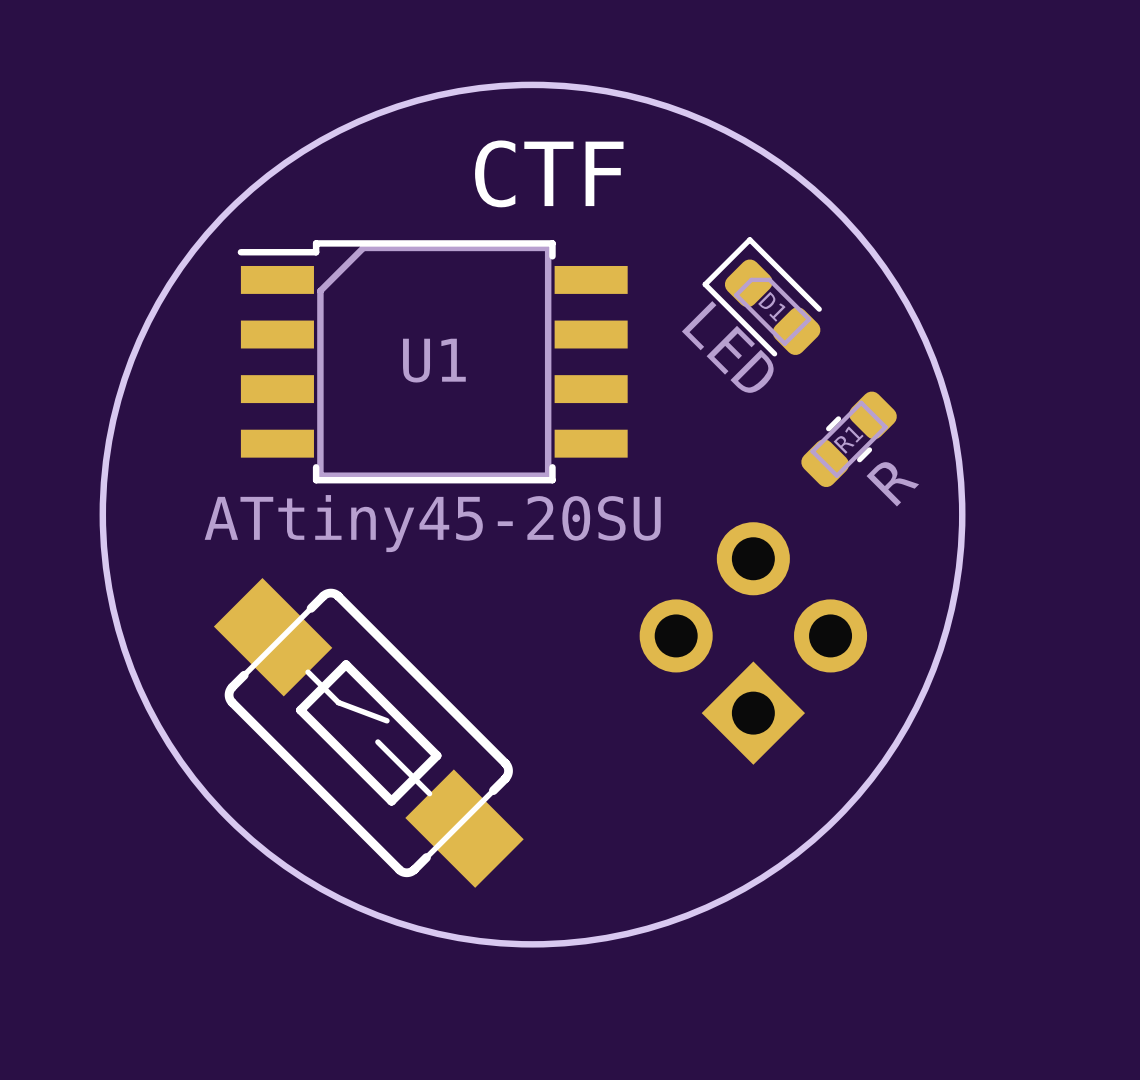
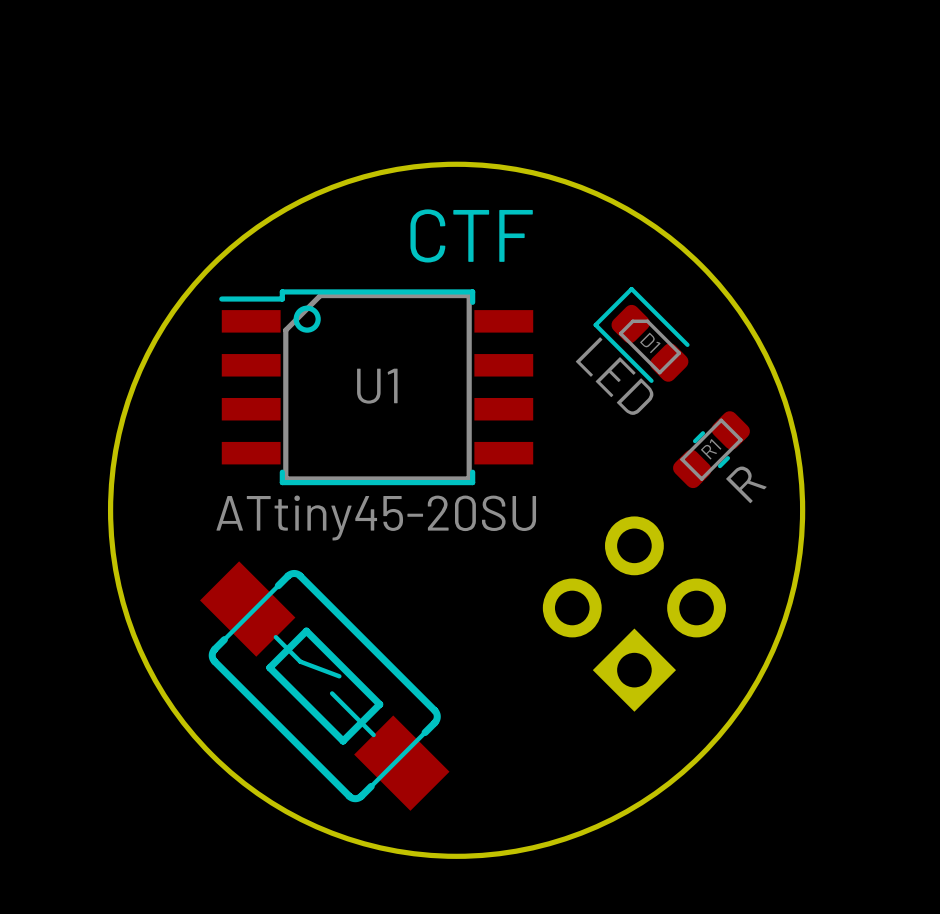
drawing: none -> [293, 305, 321, 333]

